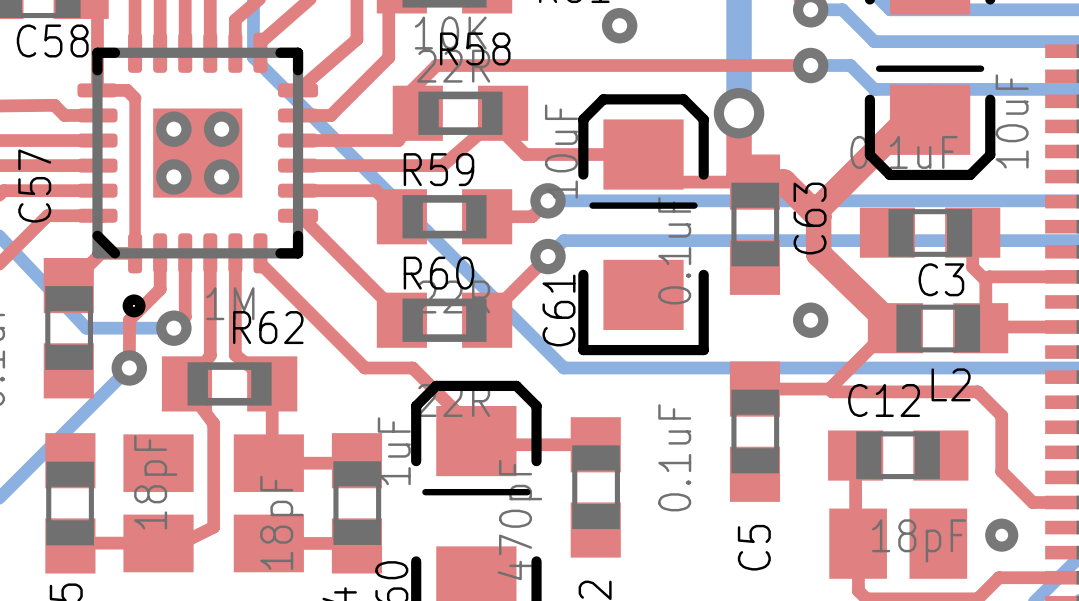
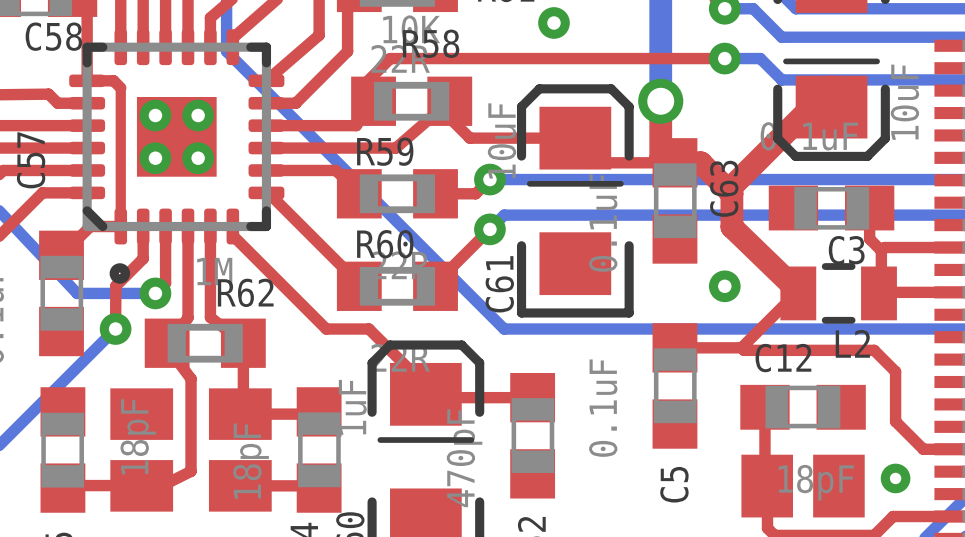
L2 footprint: [867, 303, 1009, 354] -> [780, 263, 897, 324]

